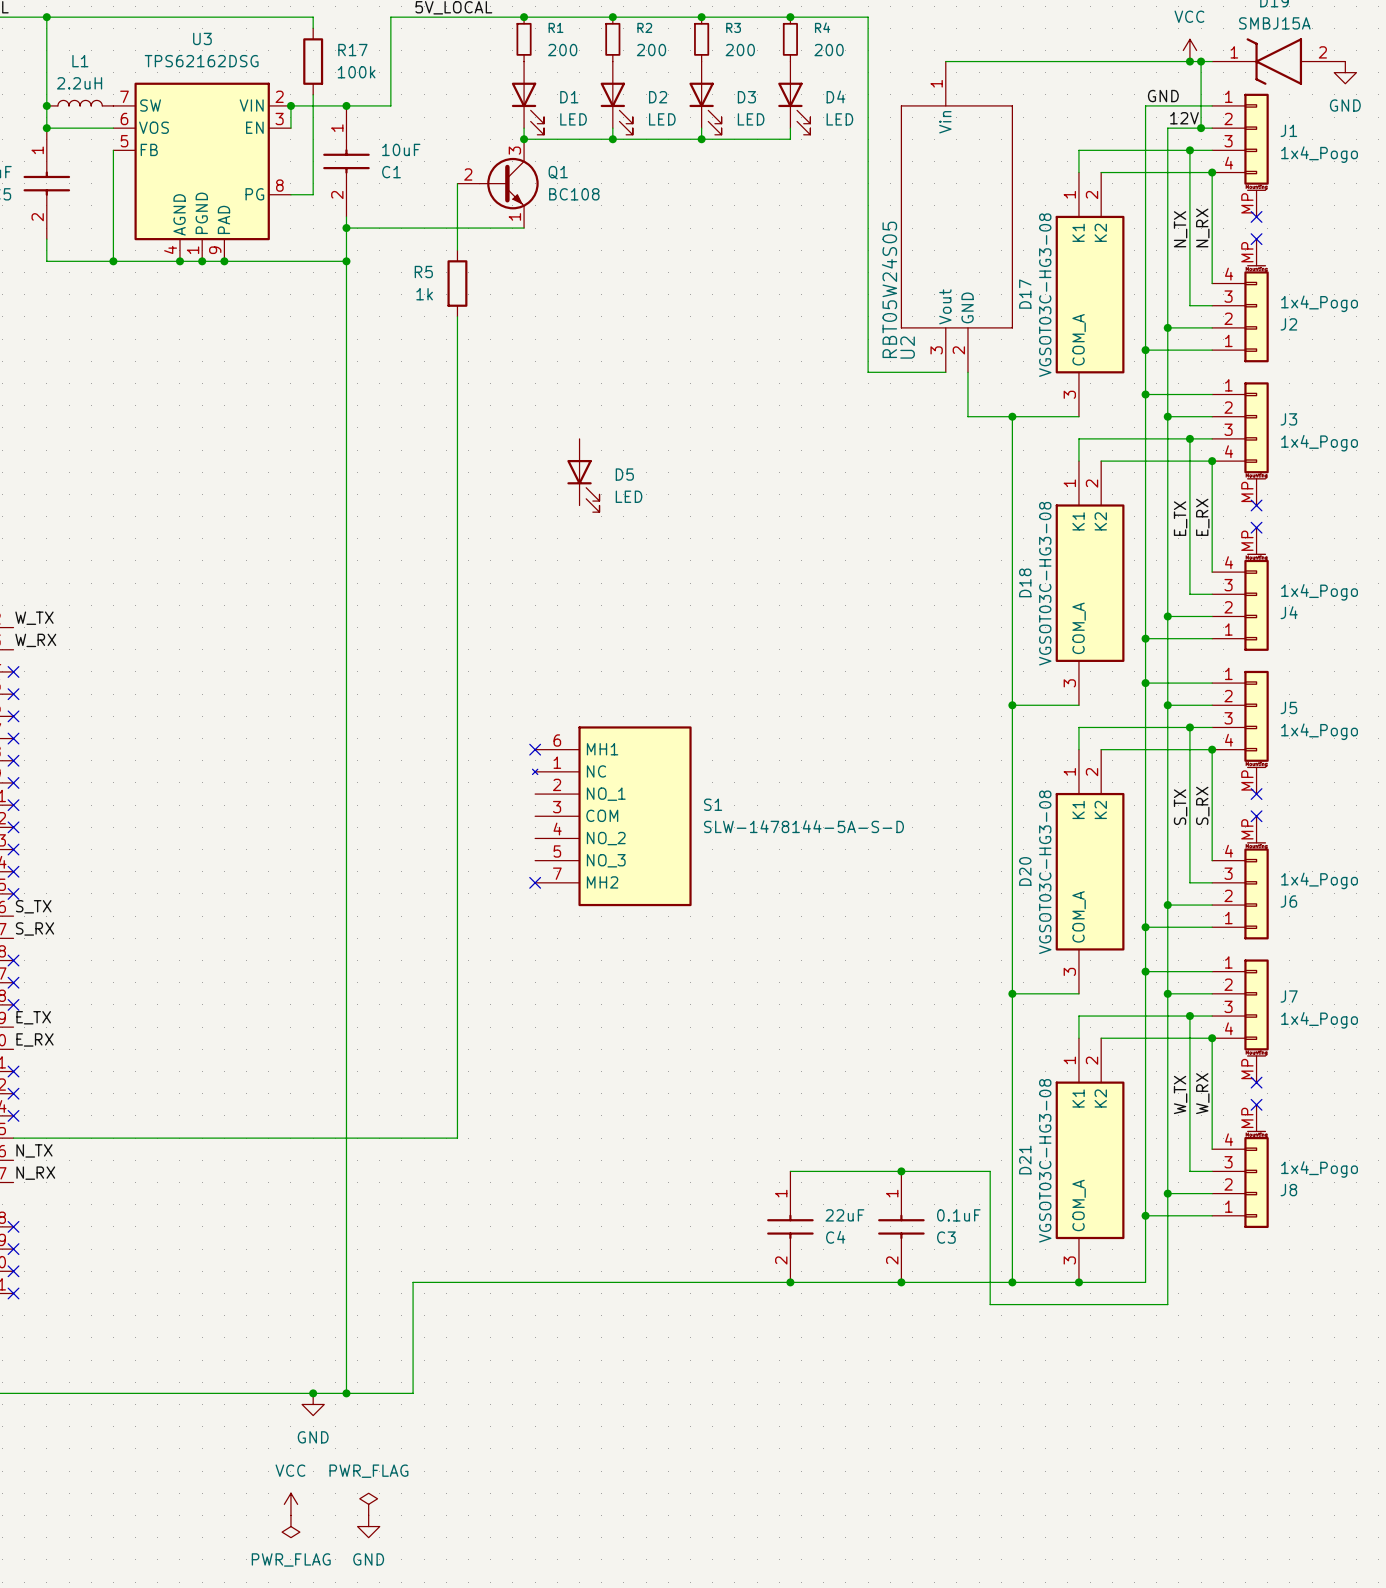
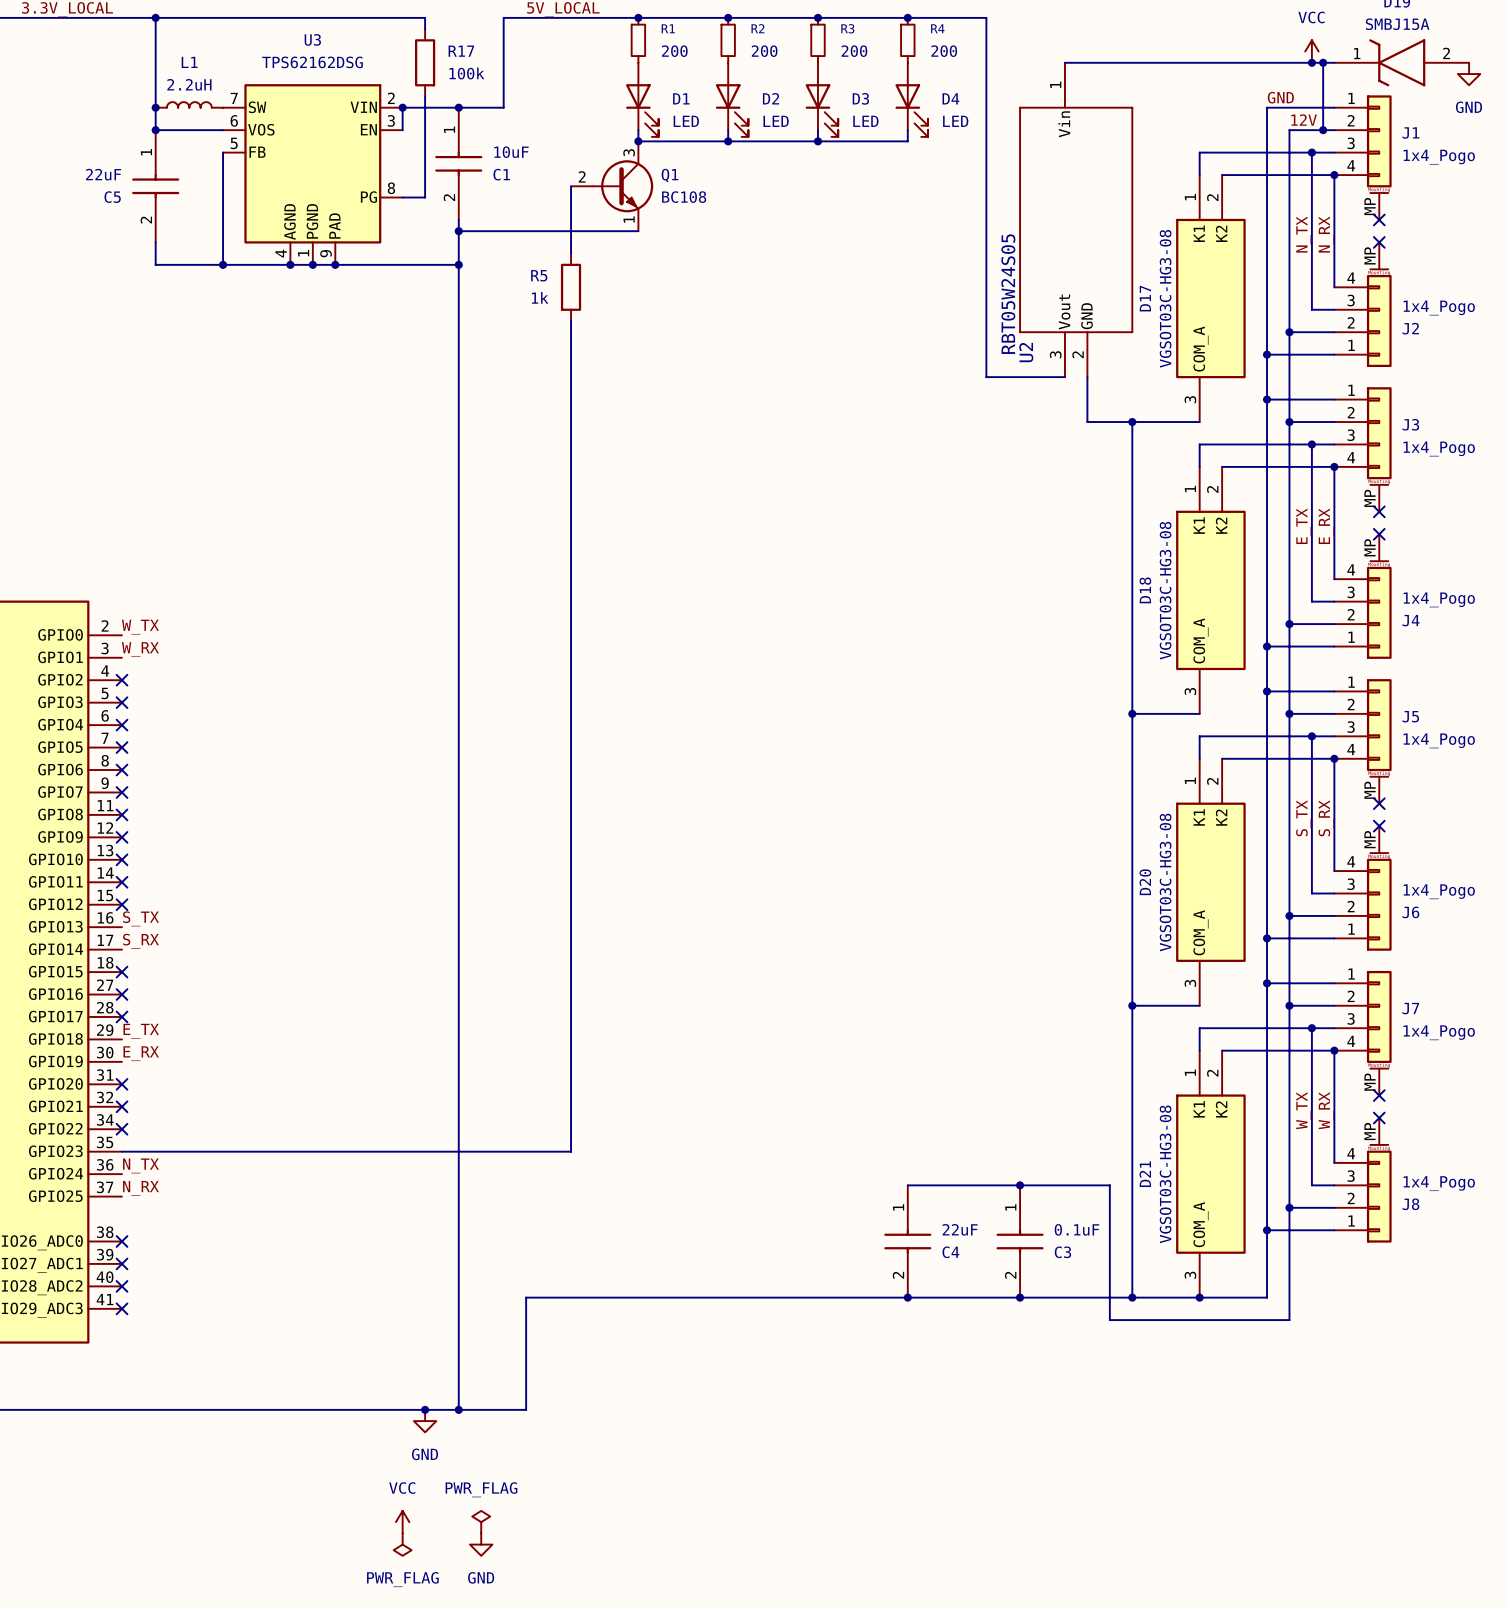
D5: LED (583, 475) -> none
no-connect mark: (535, 749) -> none
S1: SLW-1478144-5A-S-D (612, 816) -> none
no-connect mark: (535, 882) -> none

